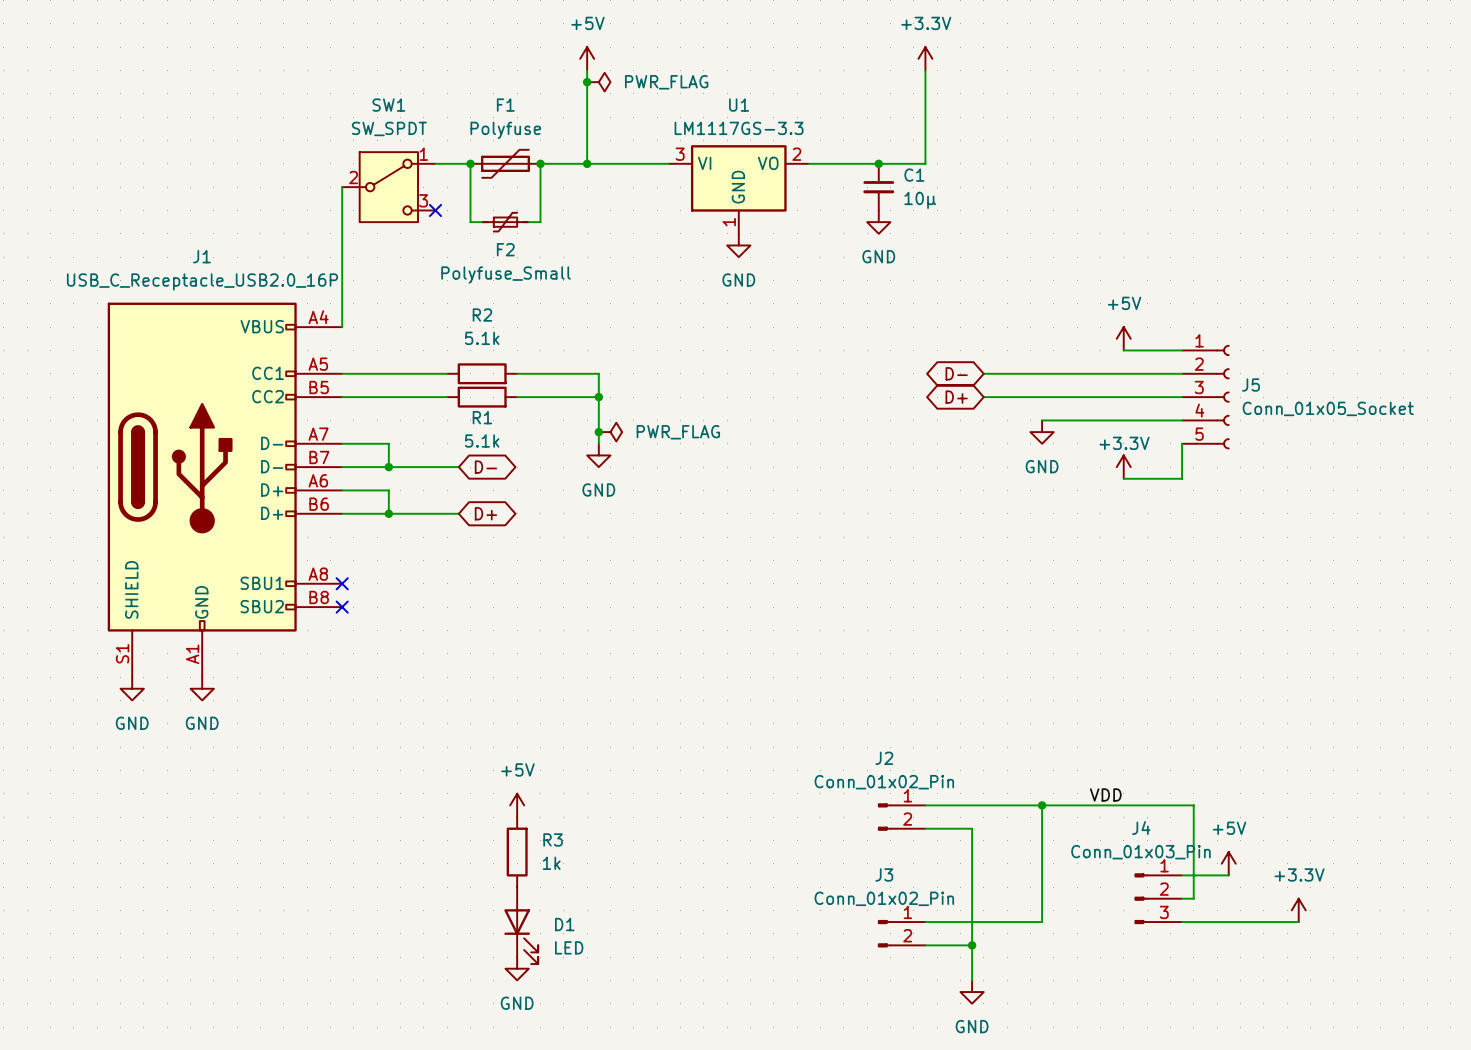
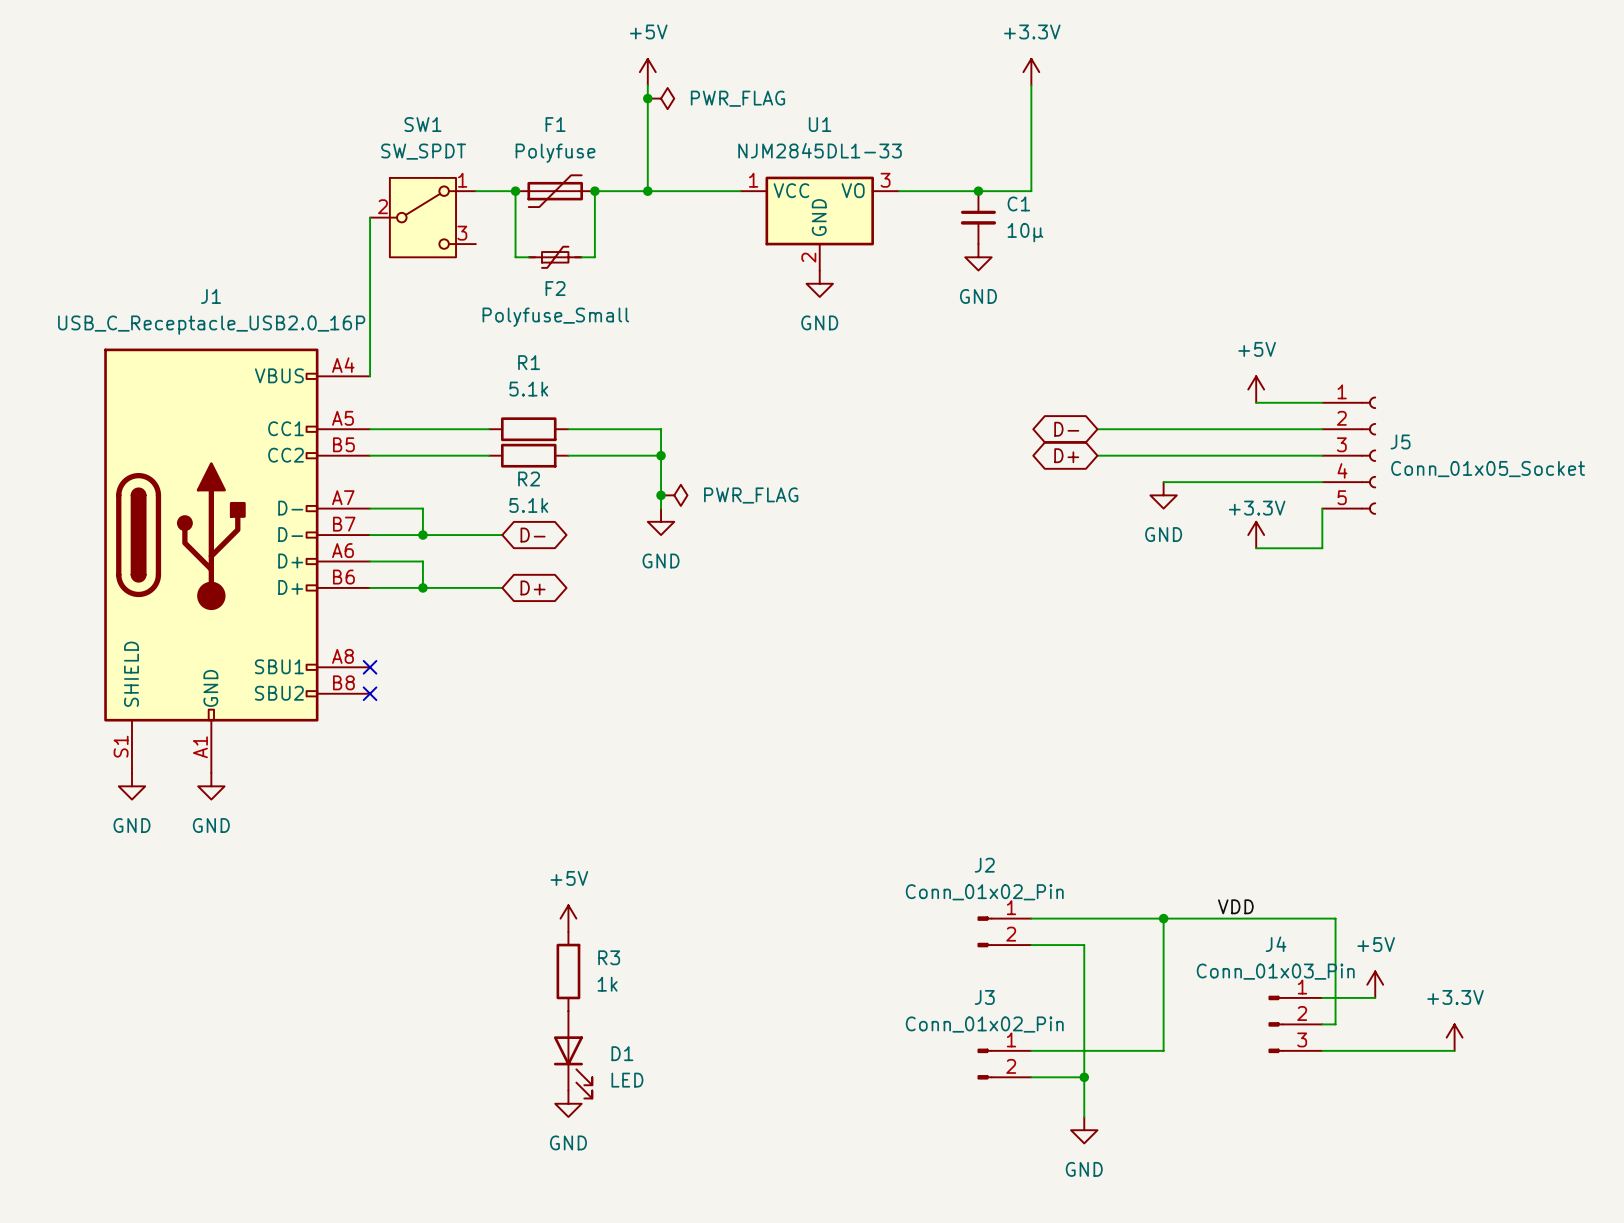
U1 value: LM1117GS-3.3 (739, 128) -> NJM2845DL1-33 (820, 150)
U1 symbol: [668, 145, 809, 234] -> [740, 176, 900, 271]
no-connect mark: (435, 210) -> none
R2 name: R2 (482, 315) -> R1 (529, 362)
R1 name: R1 (482, 417) -> R2 (529, 479)

